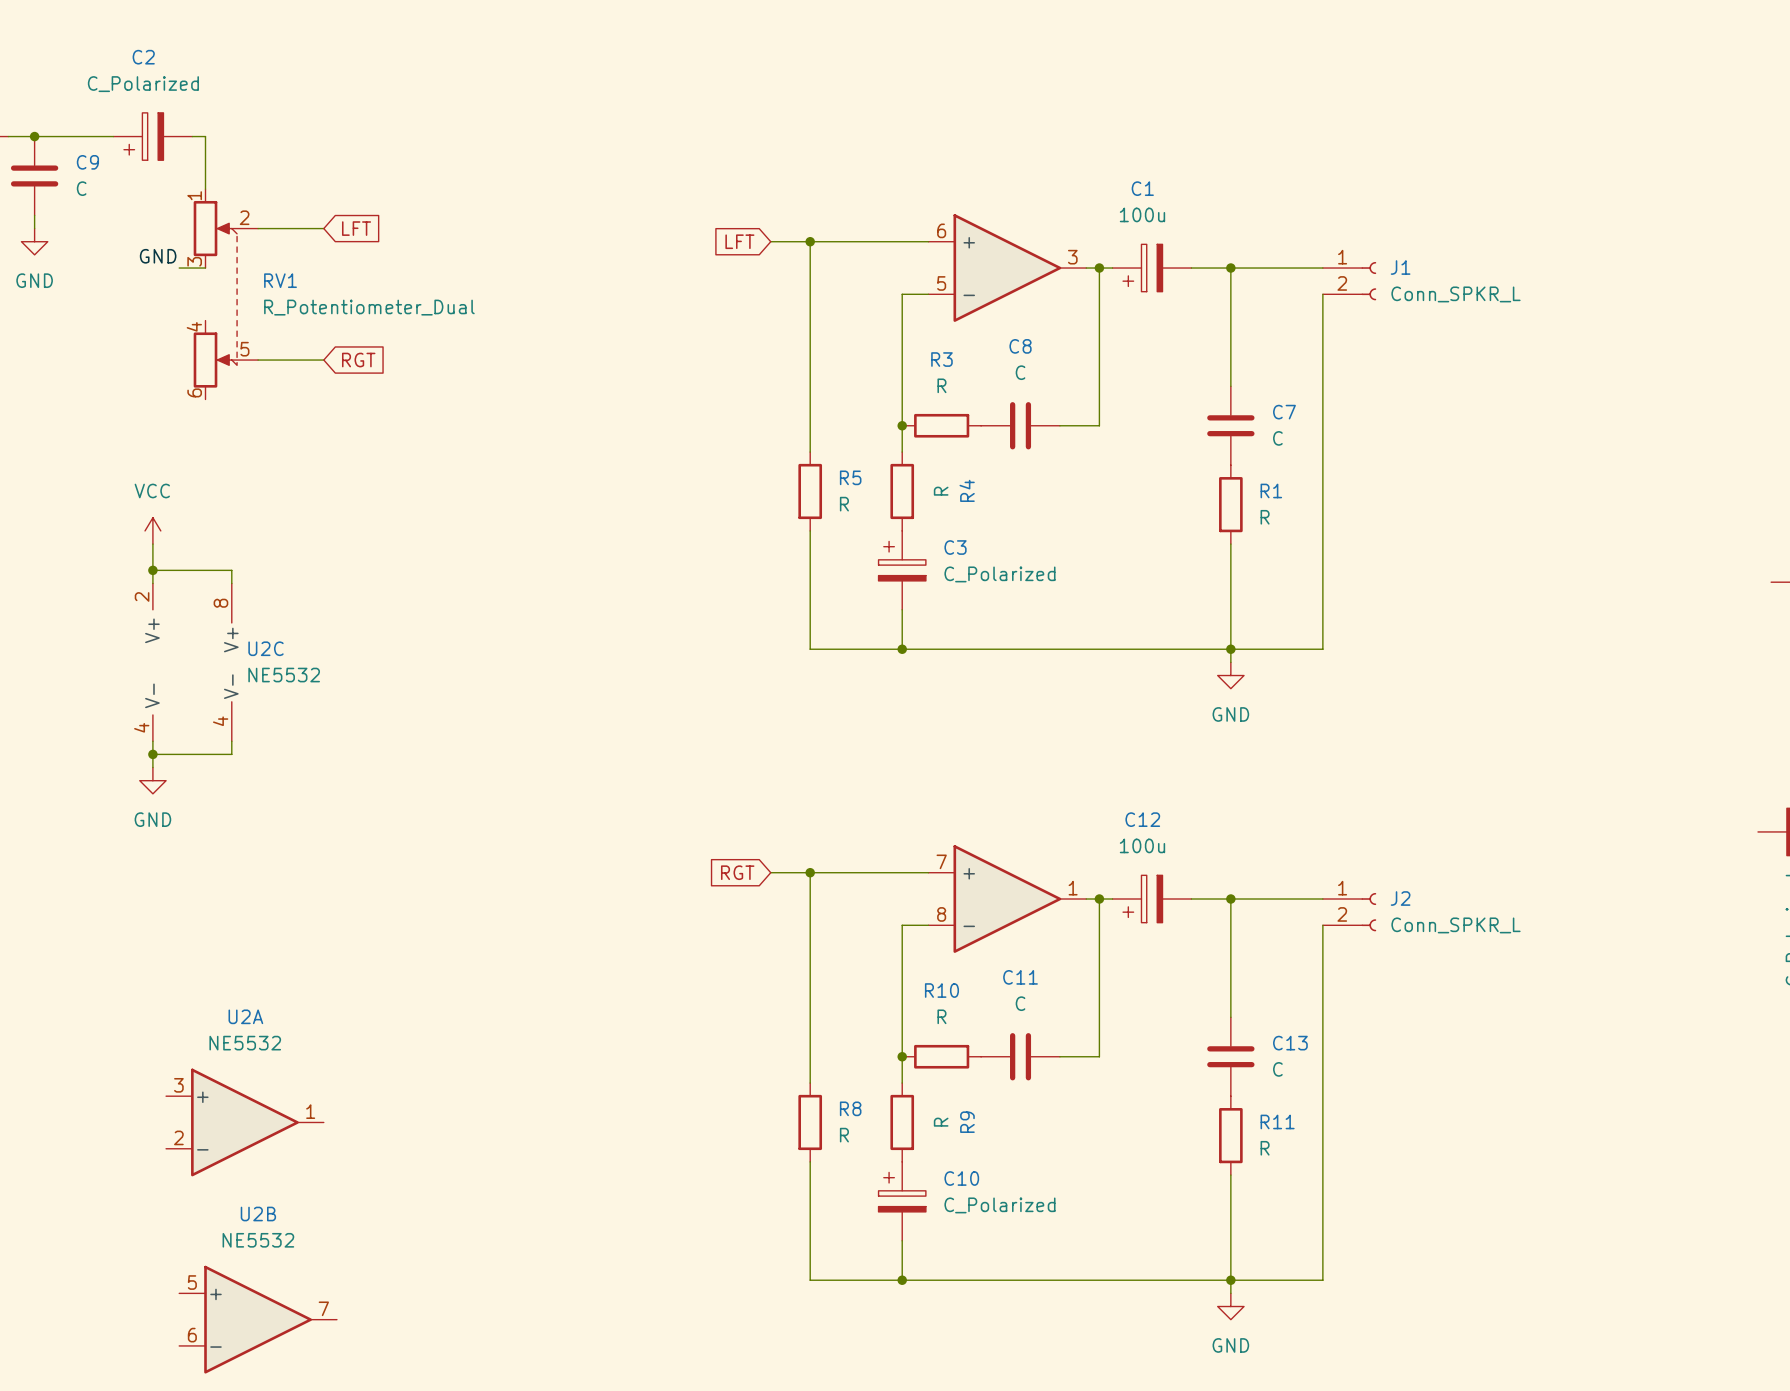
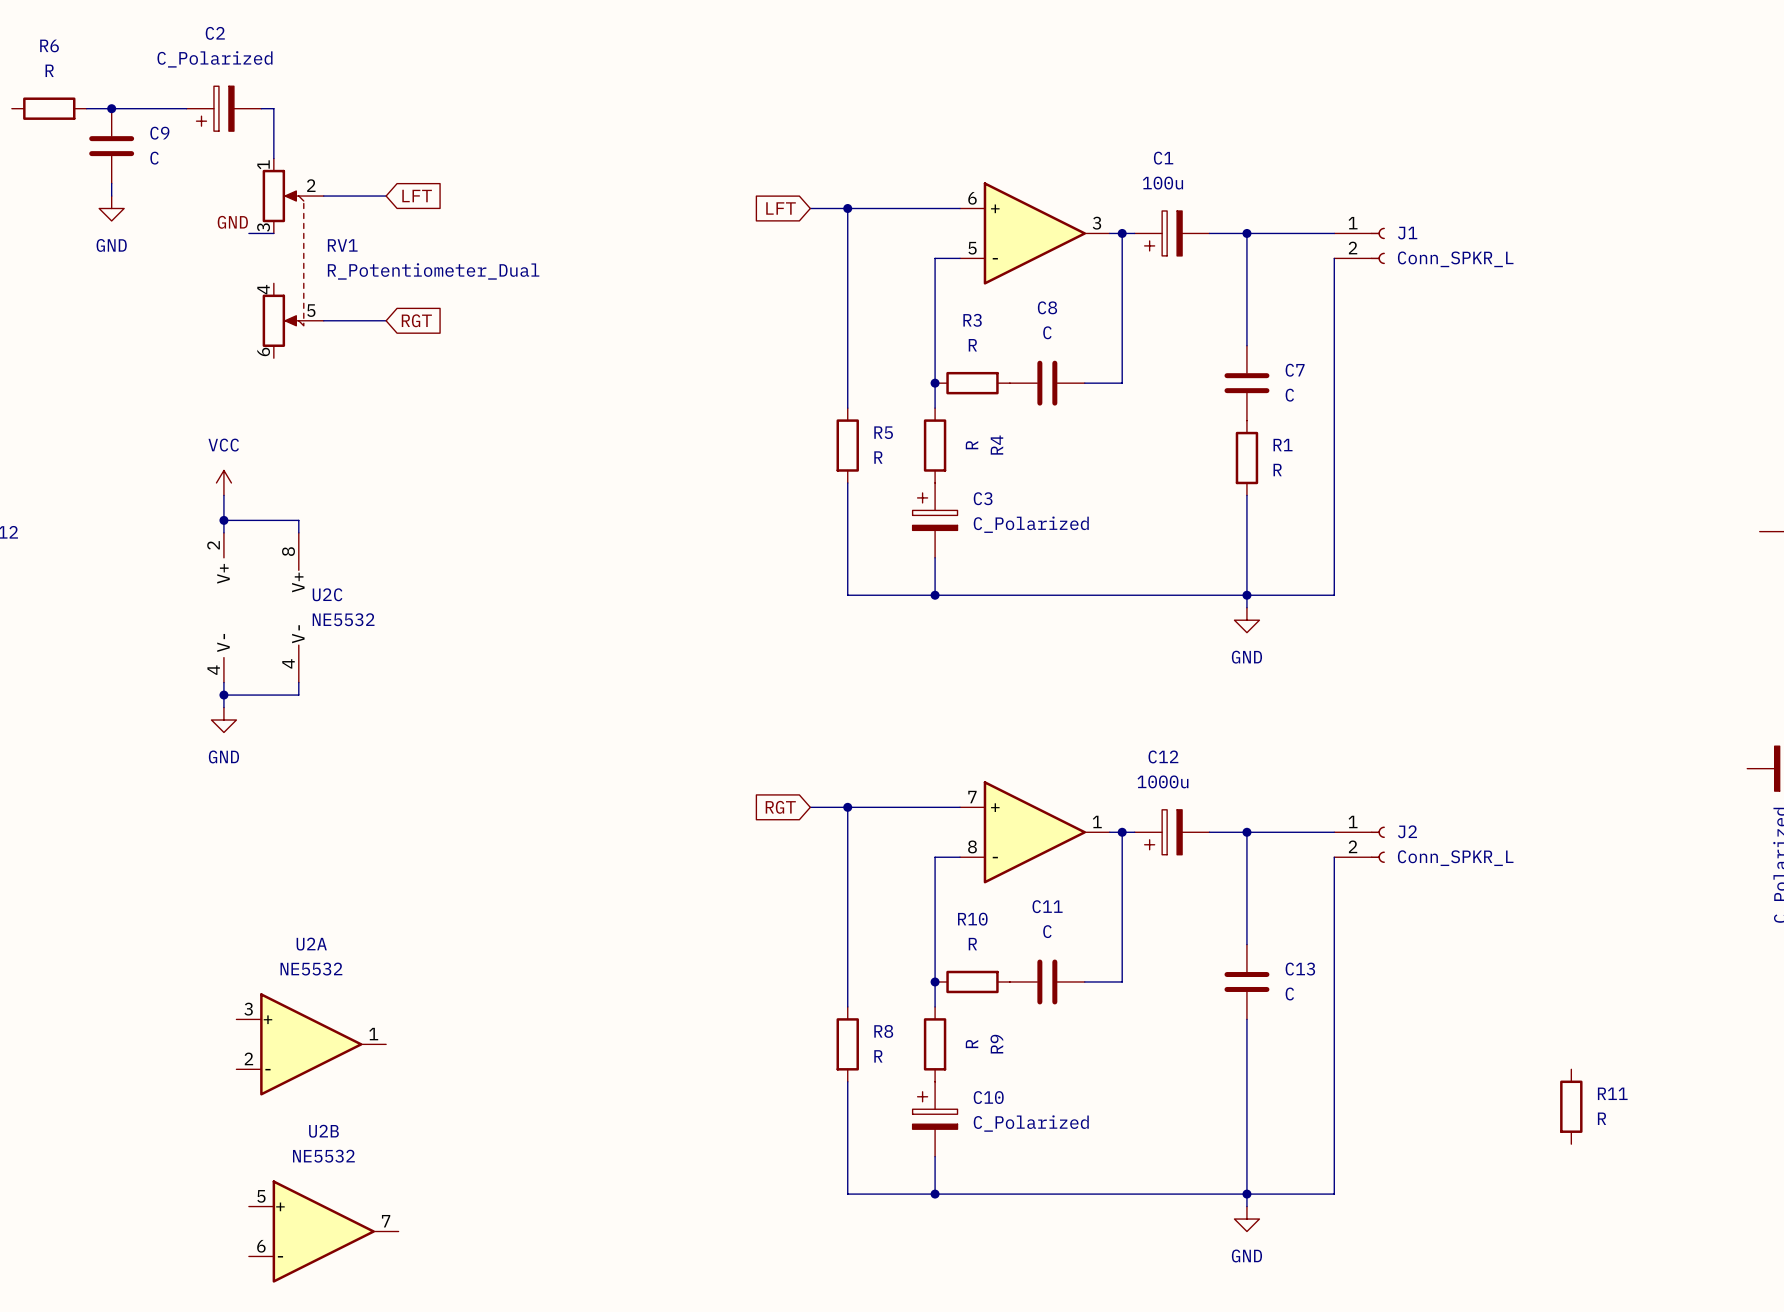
C12 value: 100u (1142, 845) -> 1000u (1162, 781)
wire: none -> (1246, 1019) (1246, 1094)
R11 position: (1230, 1135) -> (1571, 1106)

